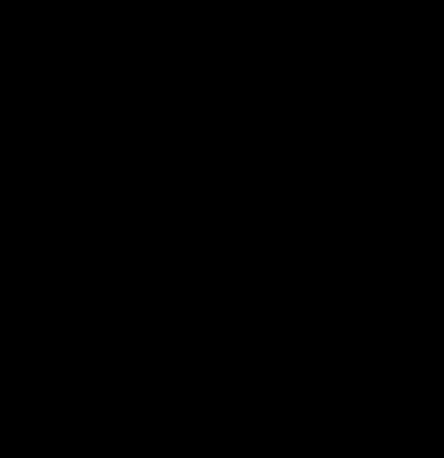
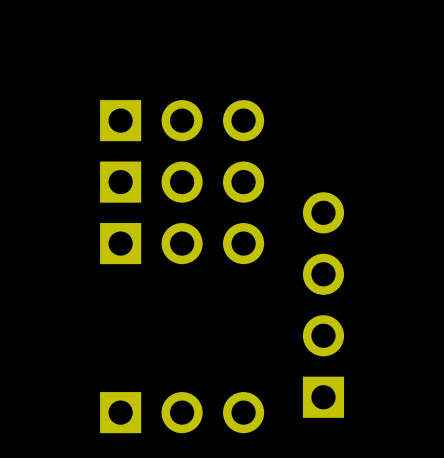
part: none -> (182, 120)
part: none -> (182, 182)
part: none -> (182, 243)
part: none -> (323, 305)
part: none -> (182, 412)

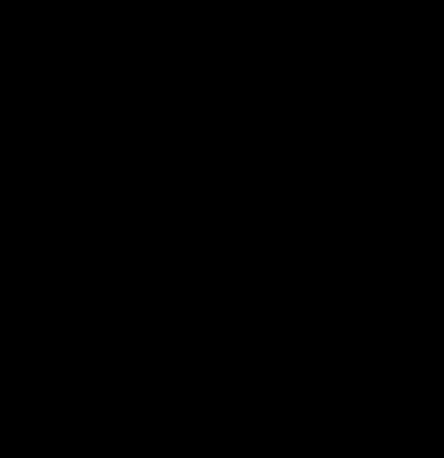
part: (182, 120) -> none
part: (182, 182) -> none
part: (182, 243) -> none
part: (323, 305) -> none
part: (182, 412) -> none

